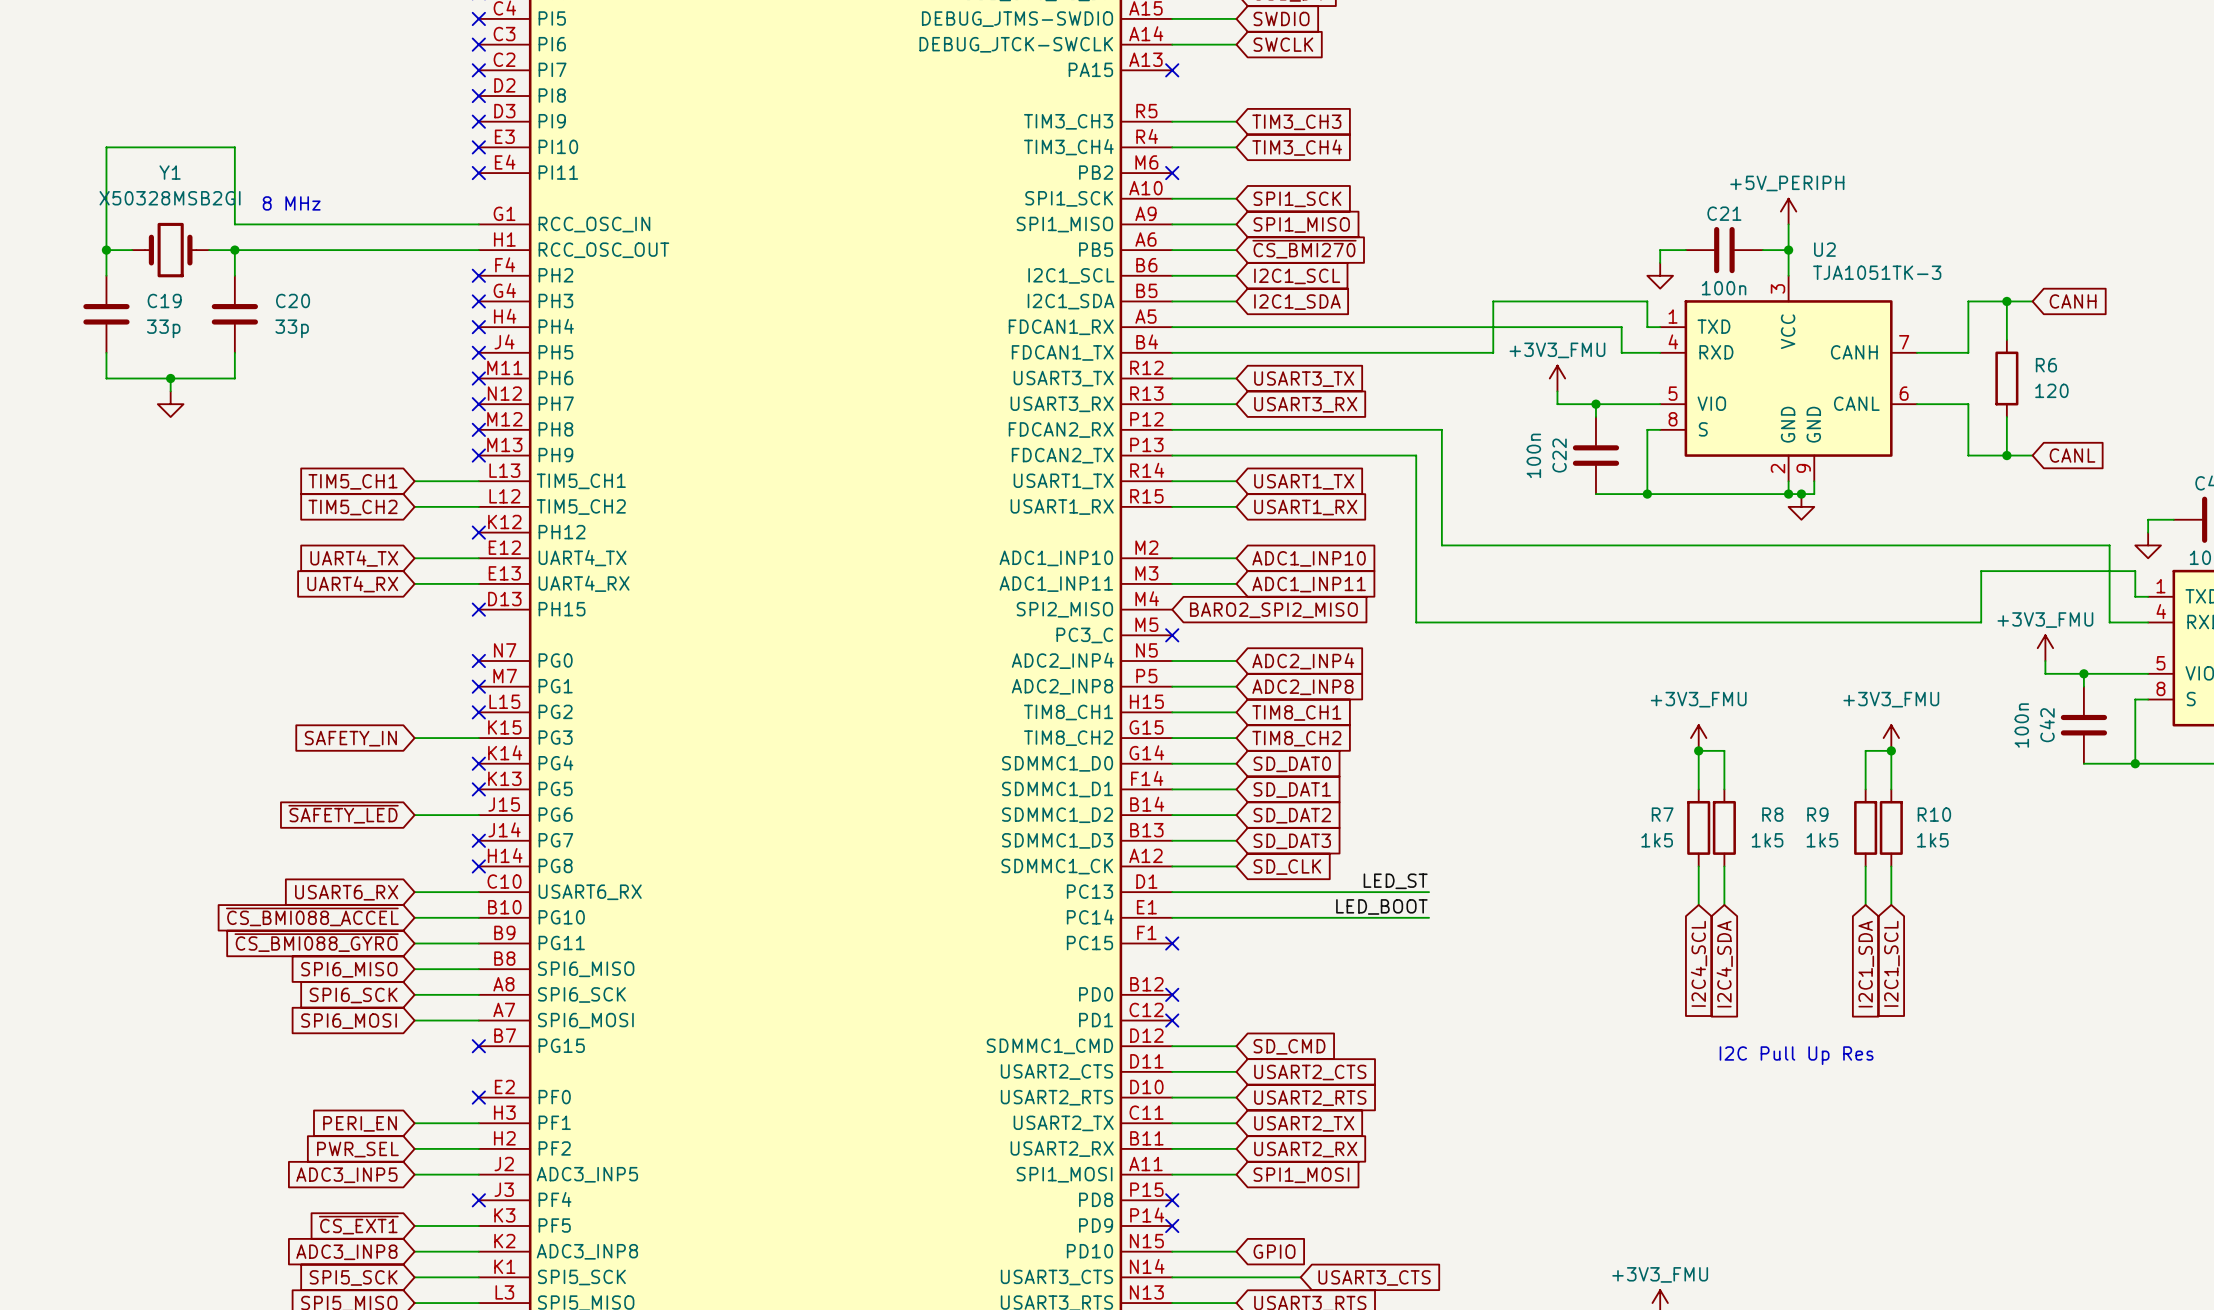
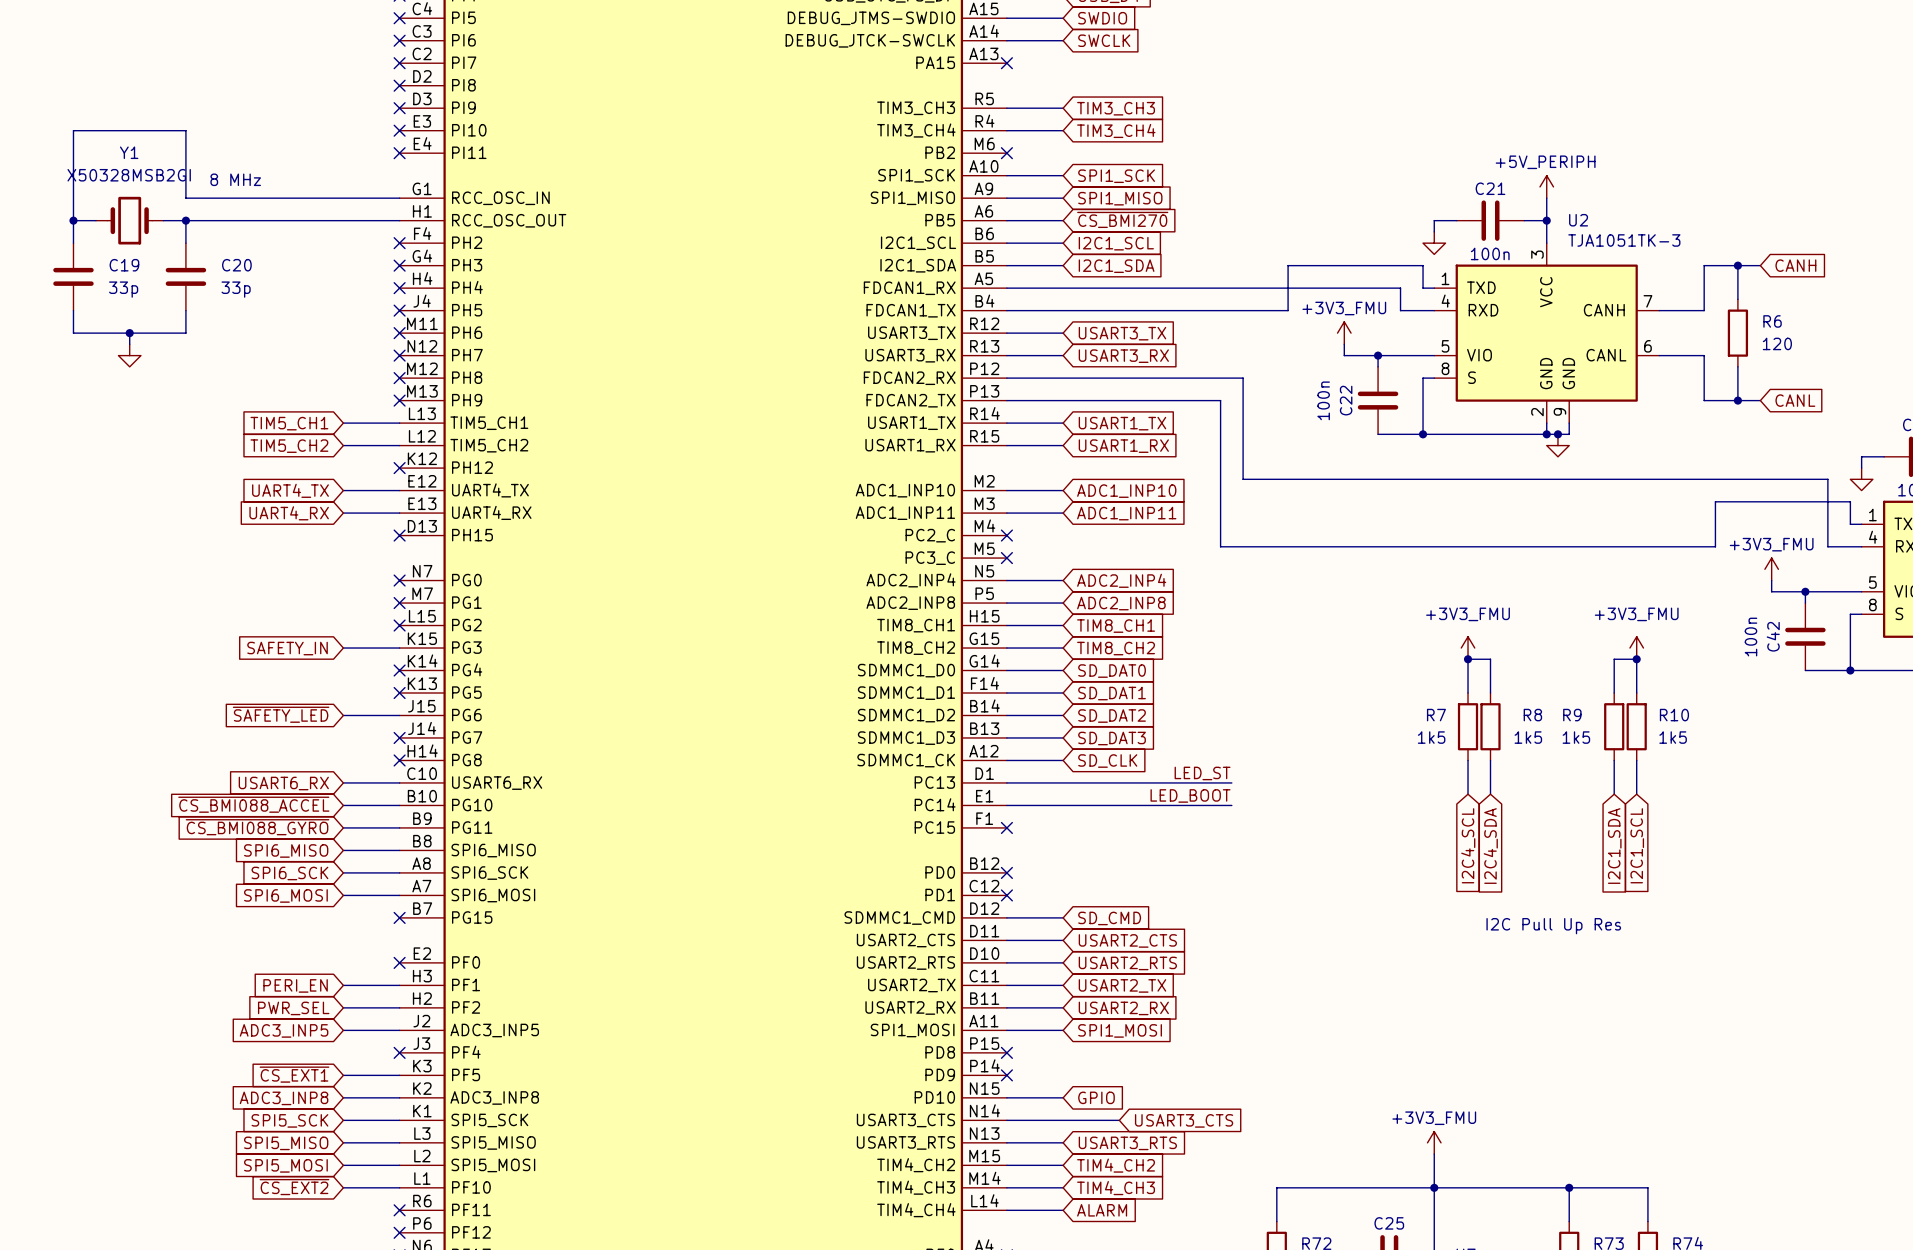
part pin name: SPI2_MISO (1064, 609) -> PC2_C (930, 535)
no-connect mark: none -> (1006, 535)
global label: BARO2_SPI2_MISO (1273, 610) -> none

